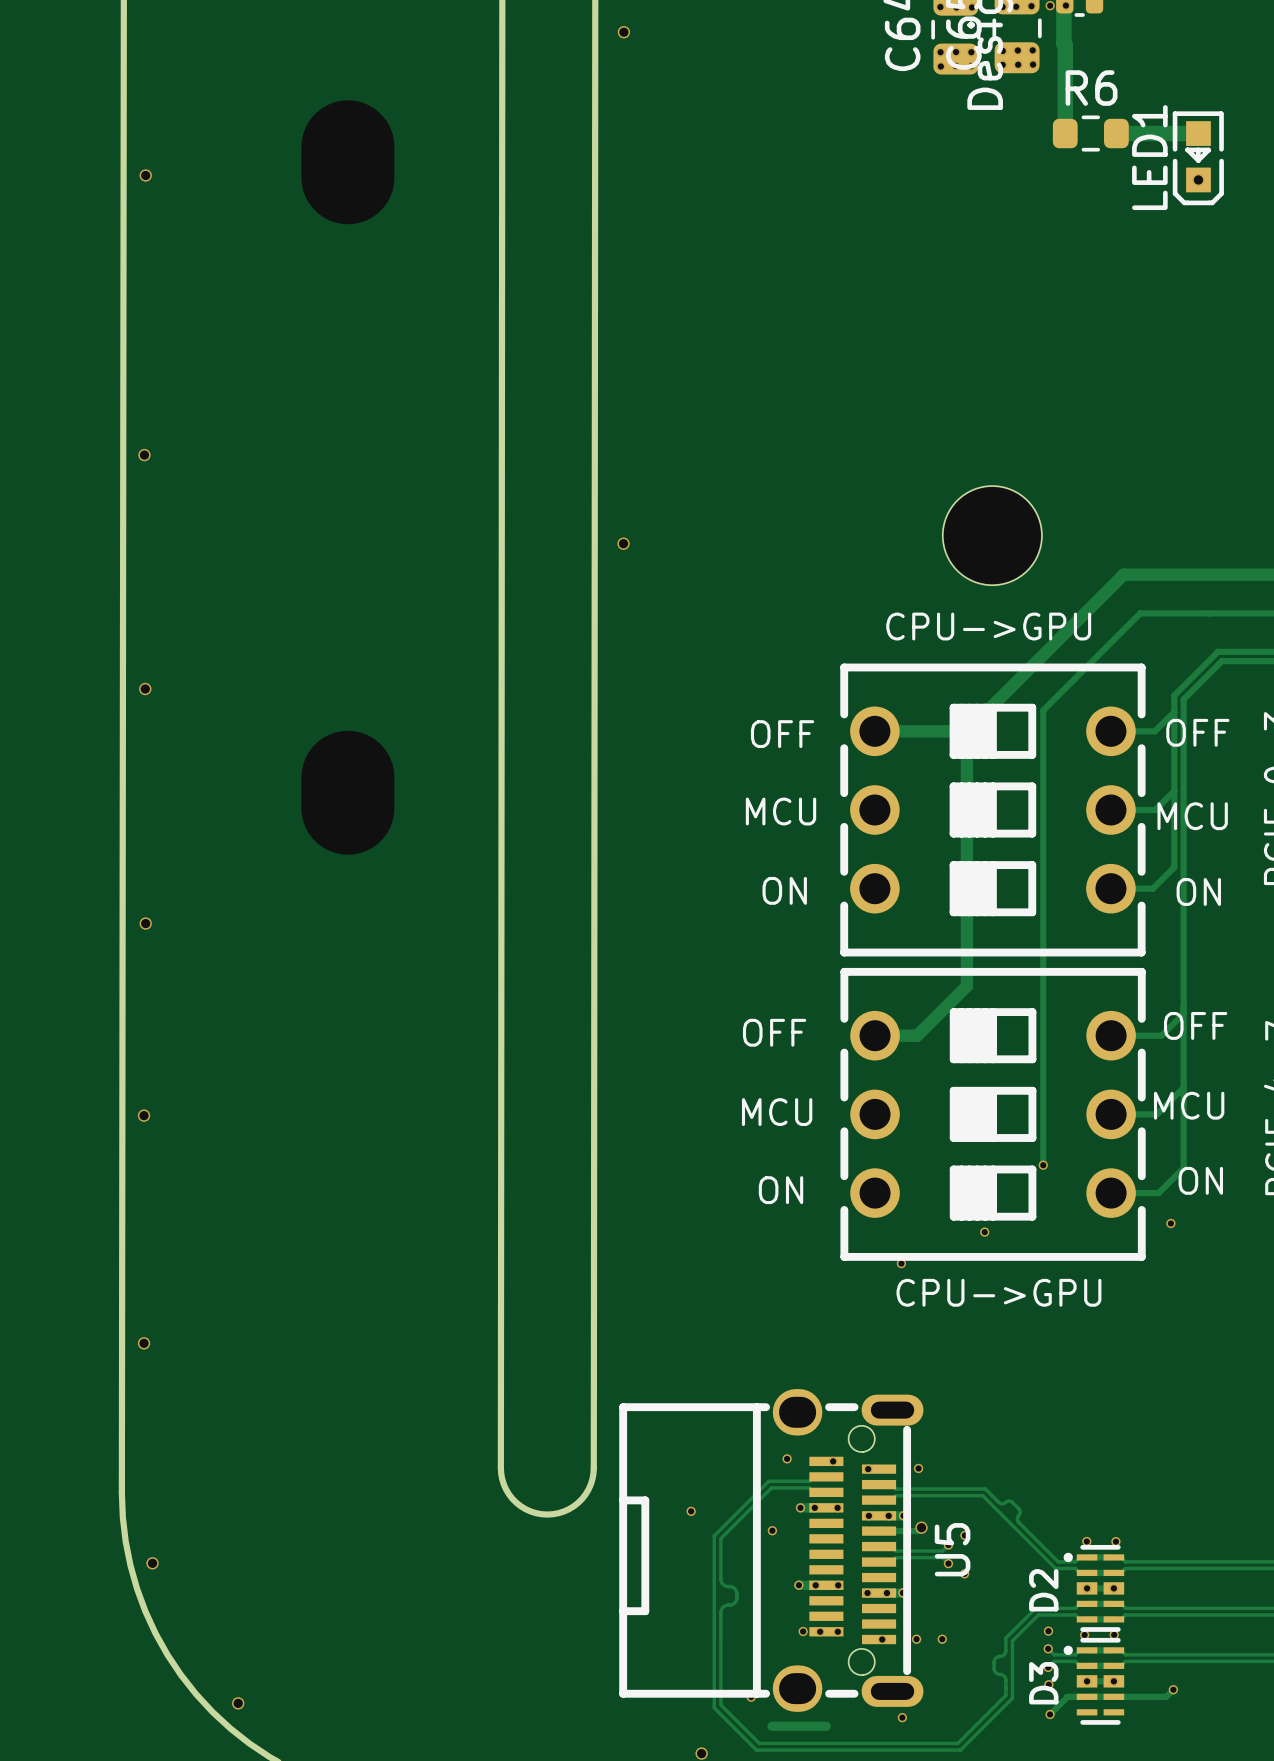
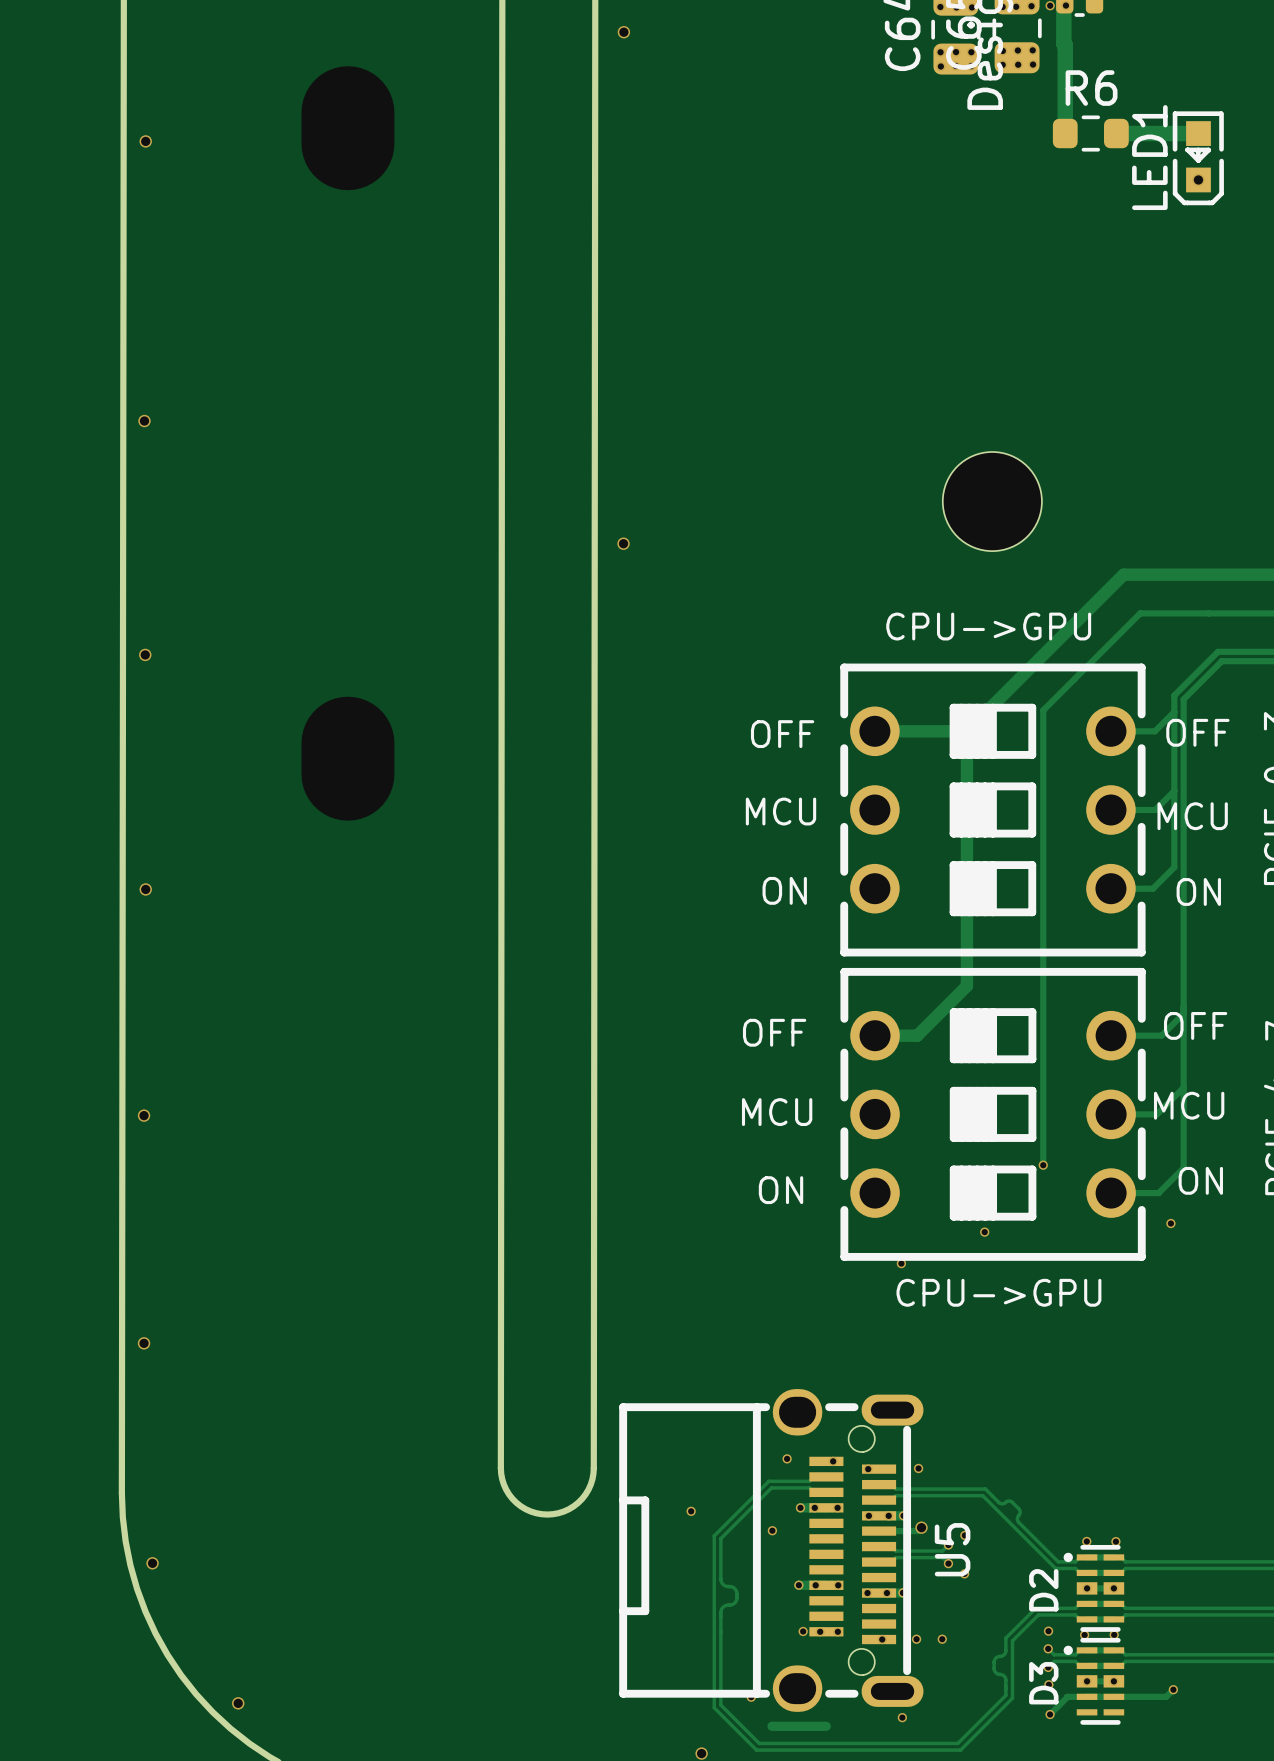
part position: (347, 162) -> (347, 128)
via position: (145, 175) -> (145, 141)
via position: (144, 455) -> (144, 421)
part position: (992, 535) -> (992, 501)
via position: (145, 689) -> (145, 654)
part position: (347, 792) -> (347, 758)
via position: (145, 923) -> (145, 889)

